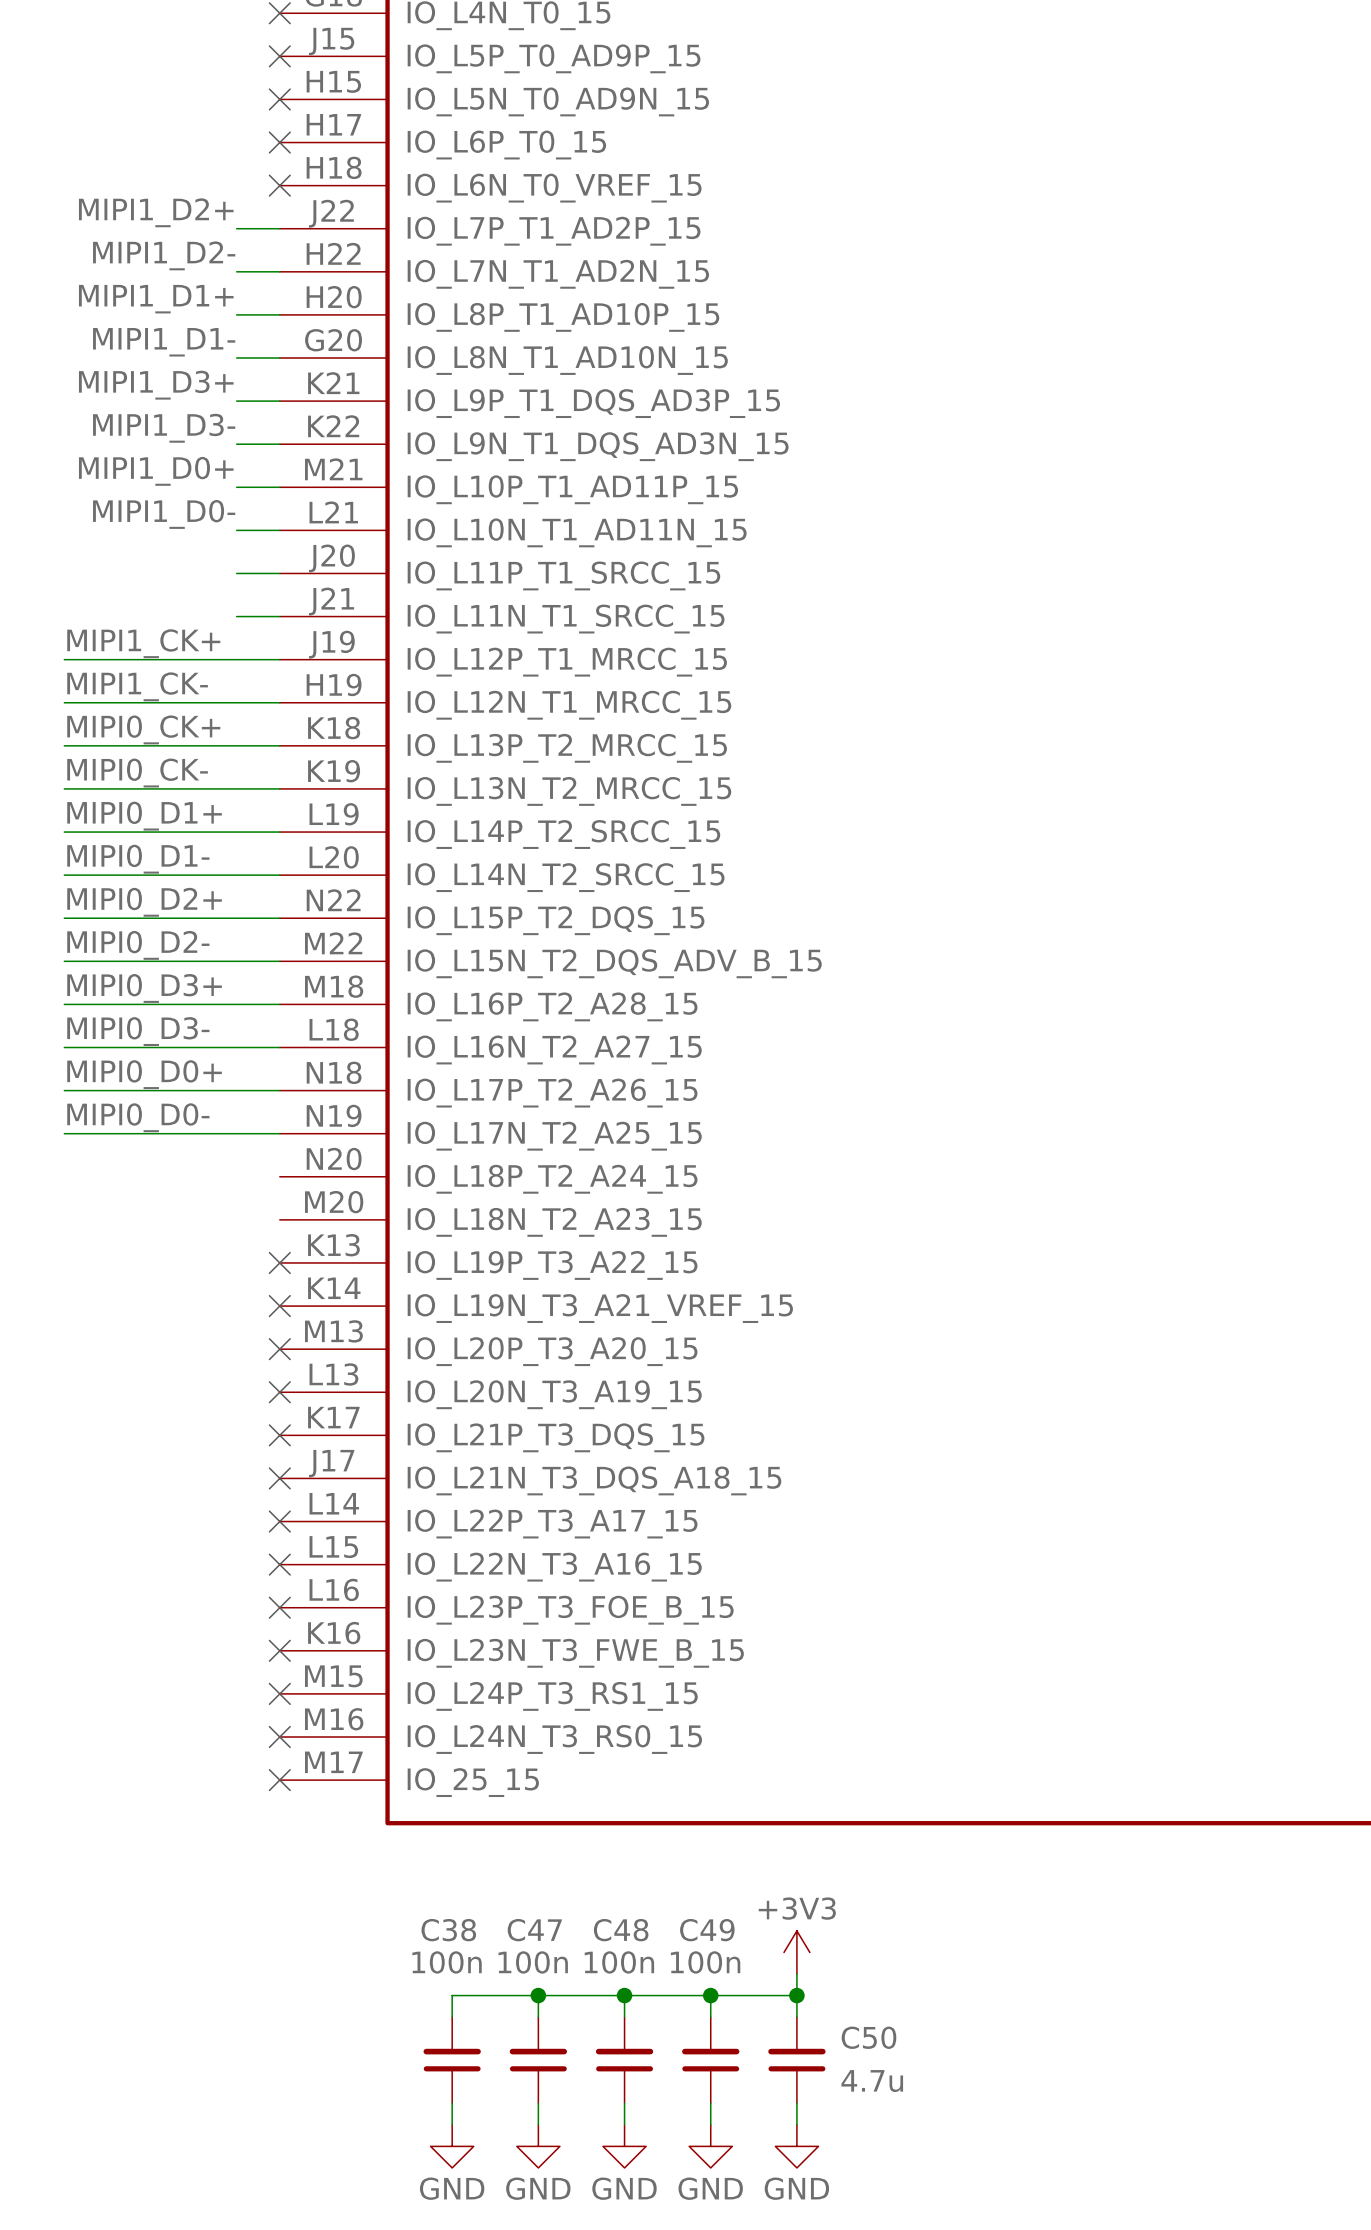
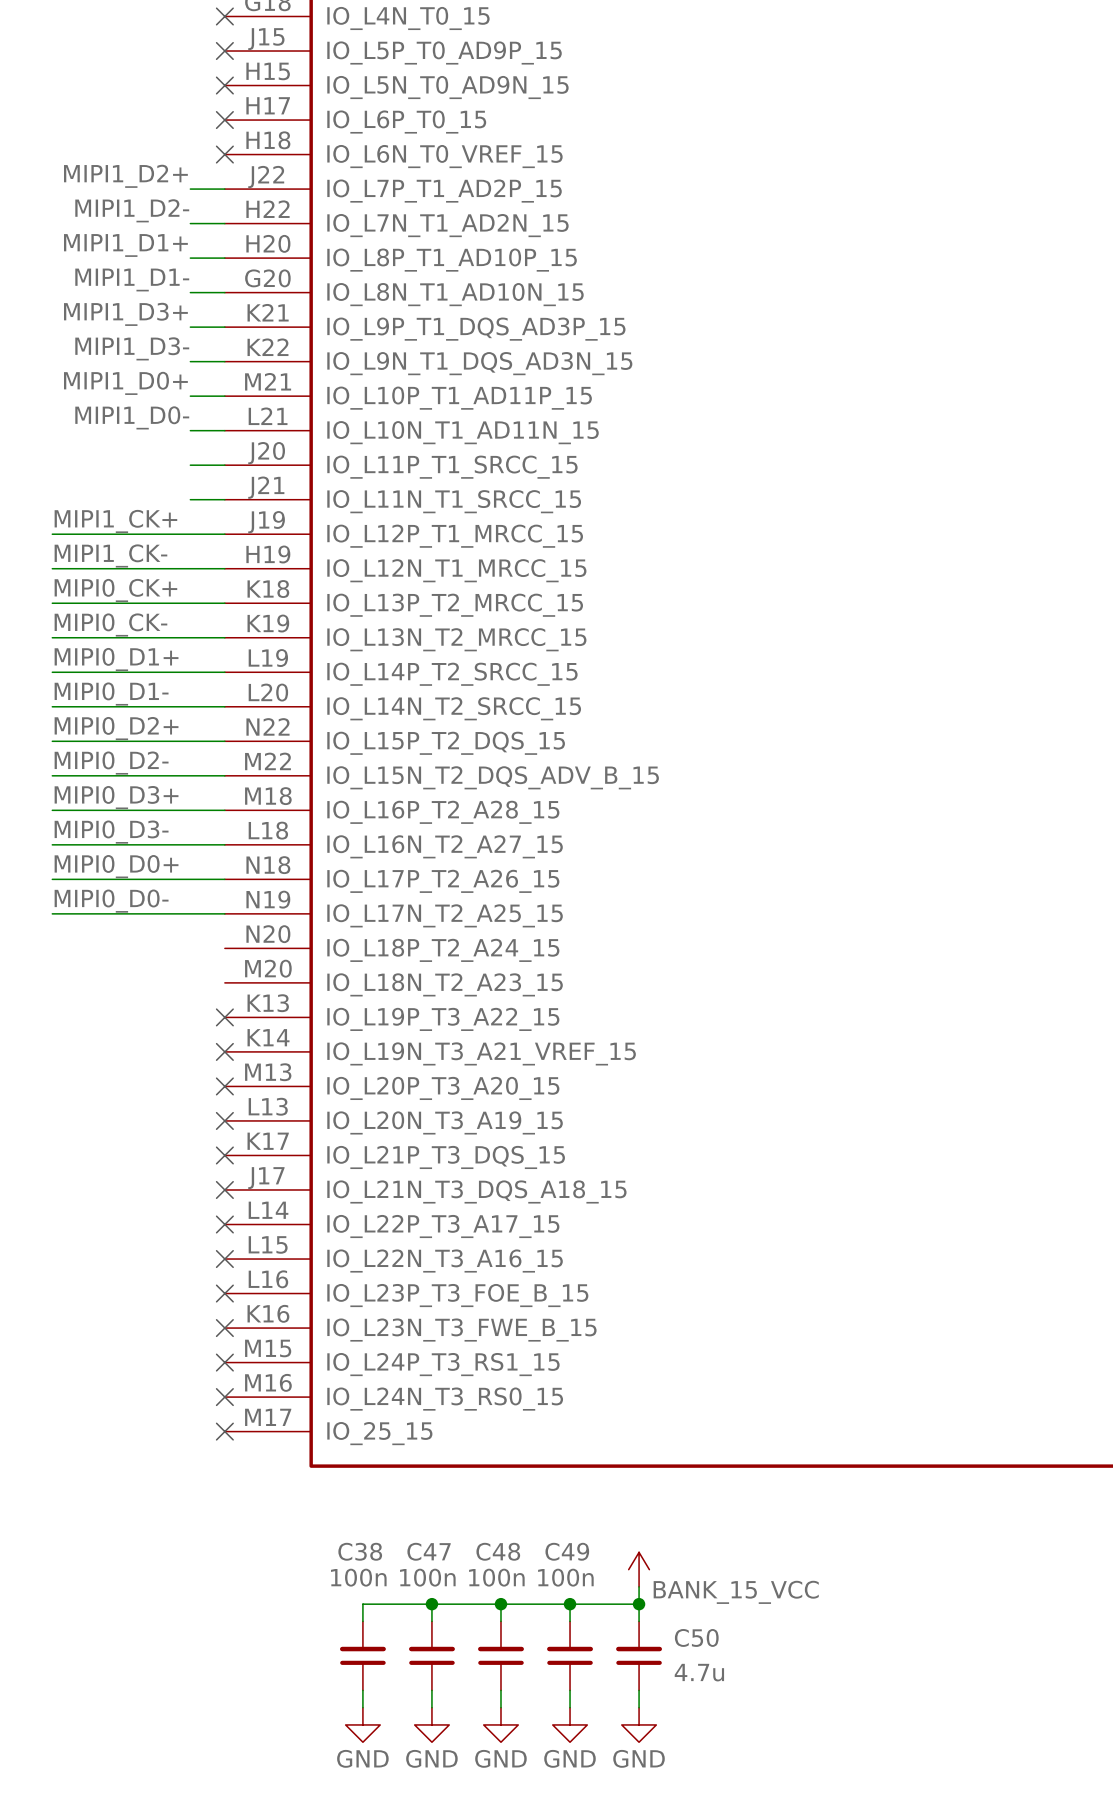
power symbol: +3V3 (796, 1952) -> BANK_15_VCC (639, 1569)

